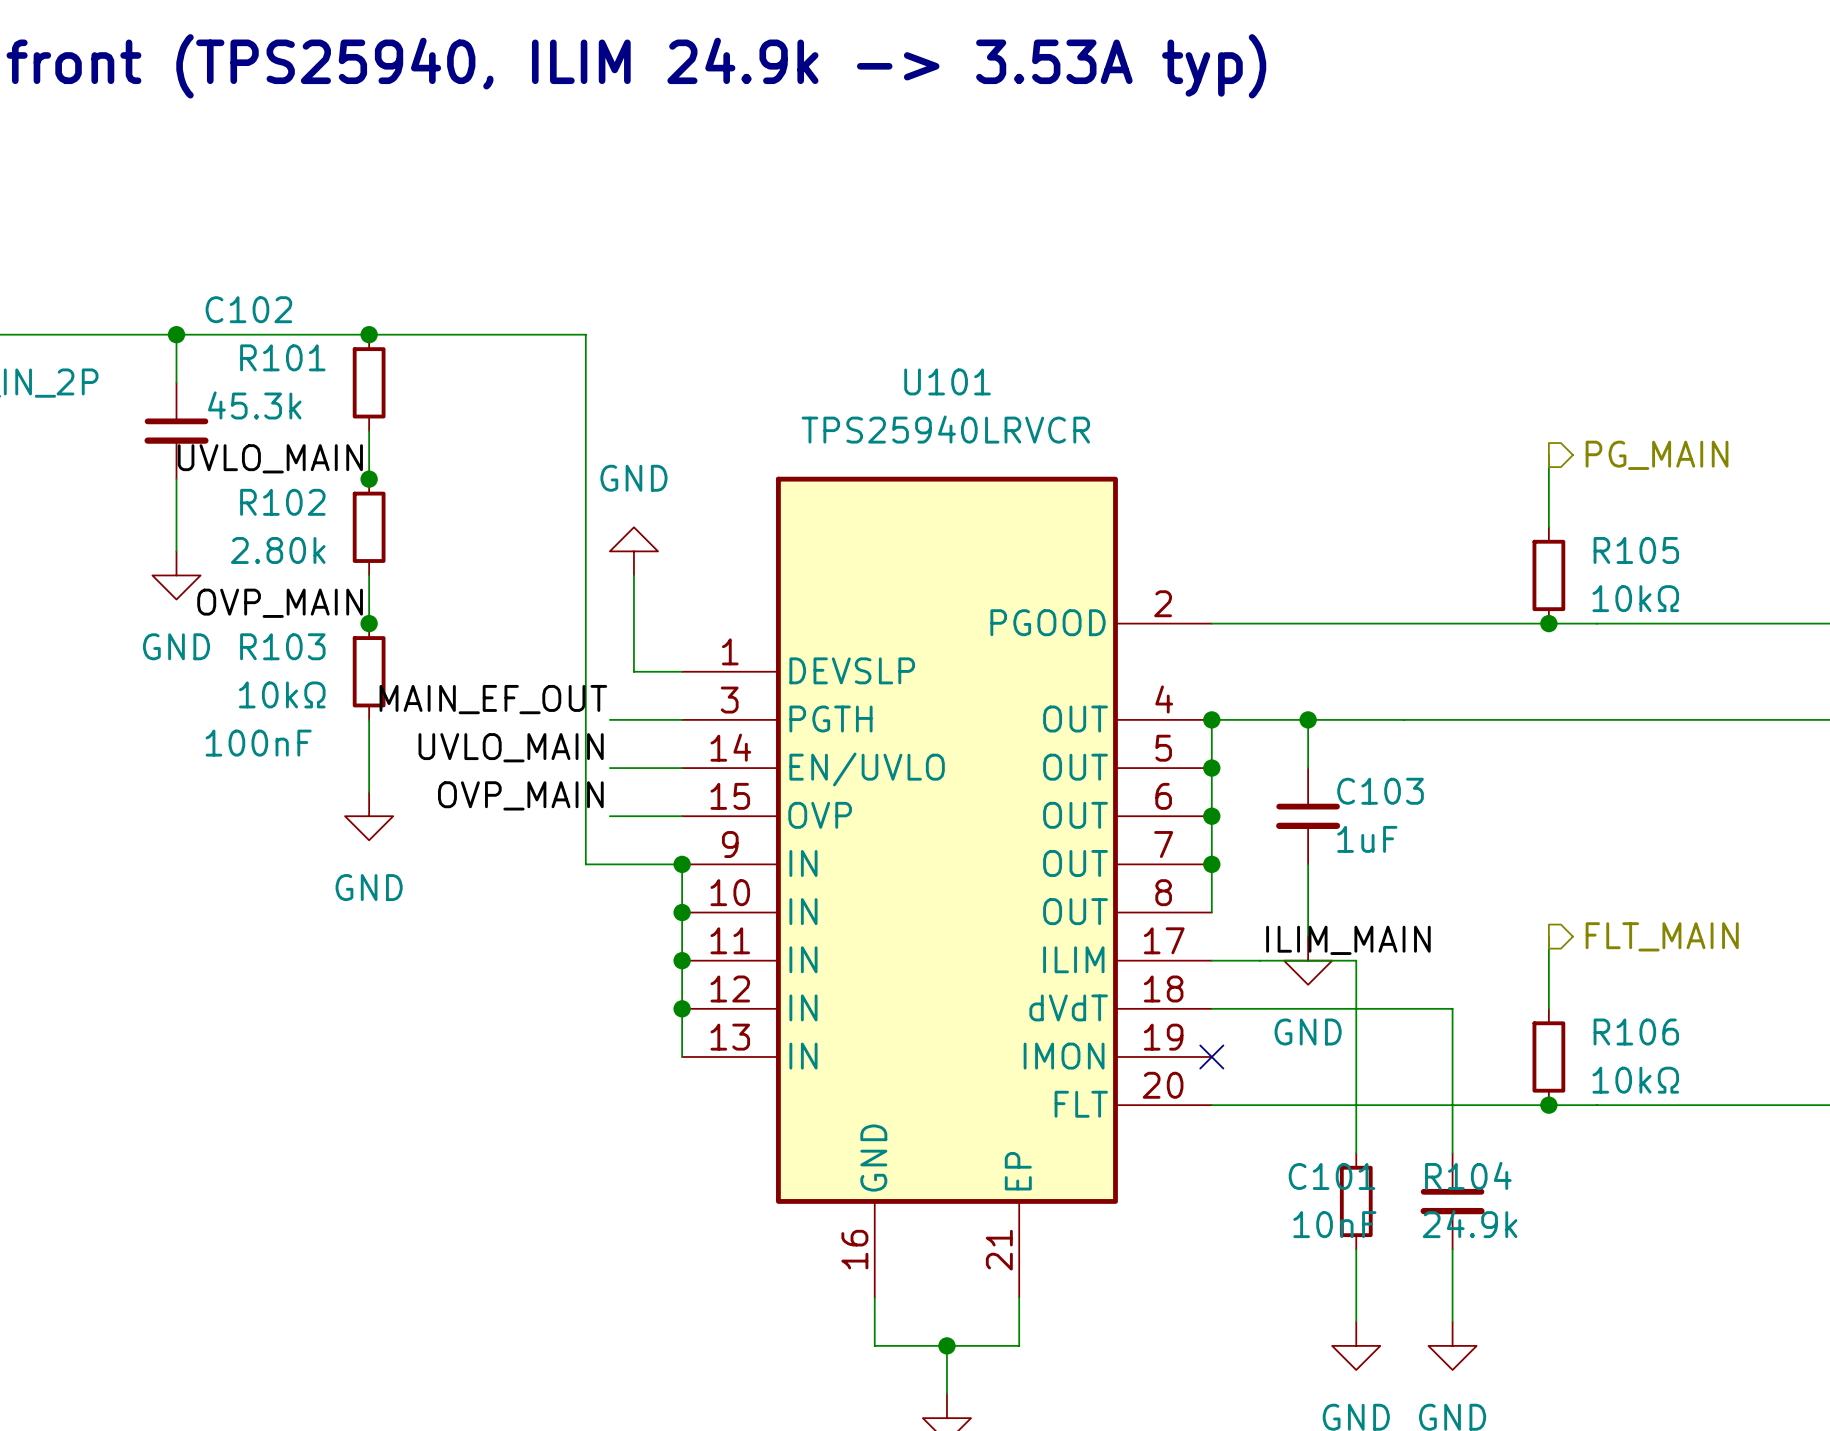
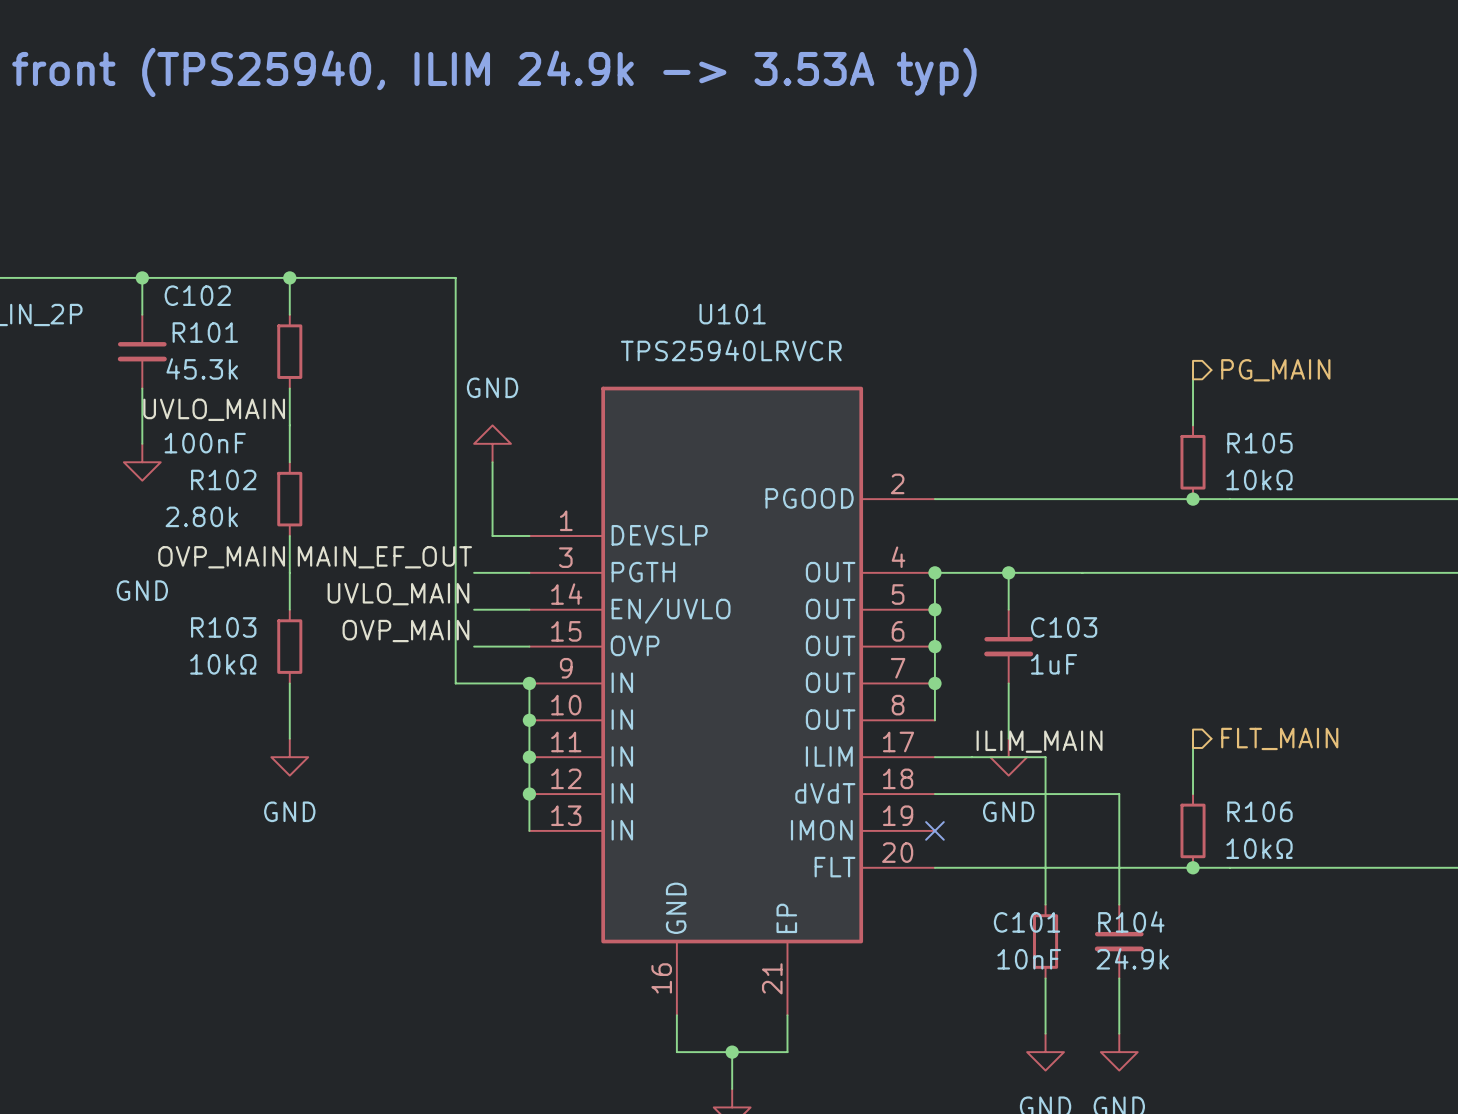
C102 name position: C102 (248, 309) -> C102 (197, 295)
R101 name position: R101 (282, 357) -> R101 (205, 332)
R101 position: (369, 382) -> (289, 351)
wire: (369, 430) (369, 479) -> (289, 277) (289, 314)
label position: UVLO_MAIN (270, 458) -> UVLO_MAIN (214, 409)
junction: (369, 479) -> none
R102 position: (369, 527) -> (289, 499)
R102 value position: 2.80k (278, 550) -> 2.80k (201, 516)
wire: (369, 575) (369, 623) -> (289, 462) (289, 388)
label position: OVP_MAIN (280, 603) -> OVP_MAIN (221, 557)
junction: (369, 623) -> none
power symbol text position: GND (176, 646) -> GND (142, 590)
wire: none -> (289, 535) (289, 572)
R103 position: (369, 671) -> (289, 646)
C102 value position: 100nF (258, 743) -> 100nF (205, 443)
power symbol position: GND (369, 816) -> GND (289, 757)
wire: none -> (289, 683) (289, 738)

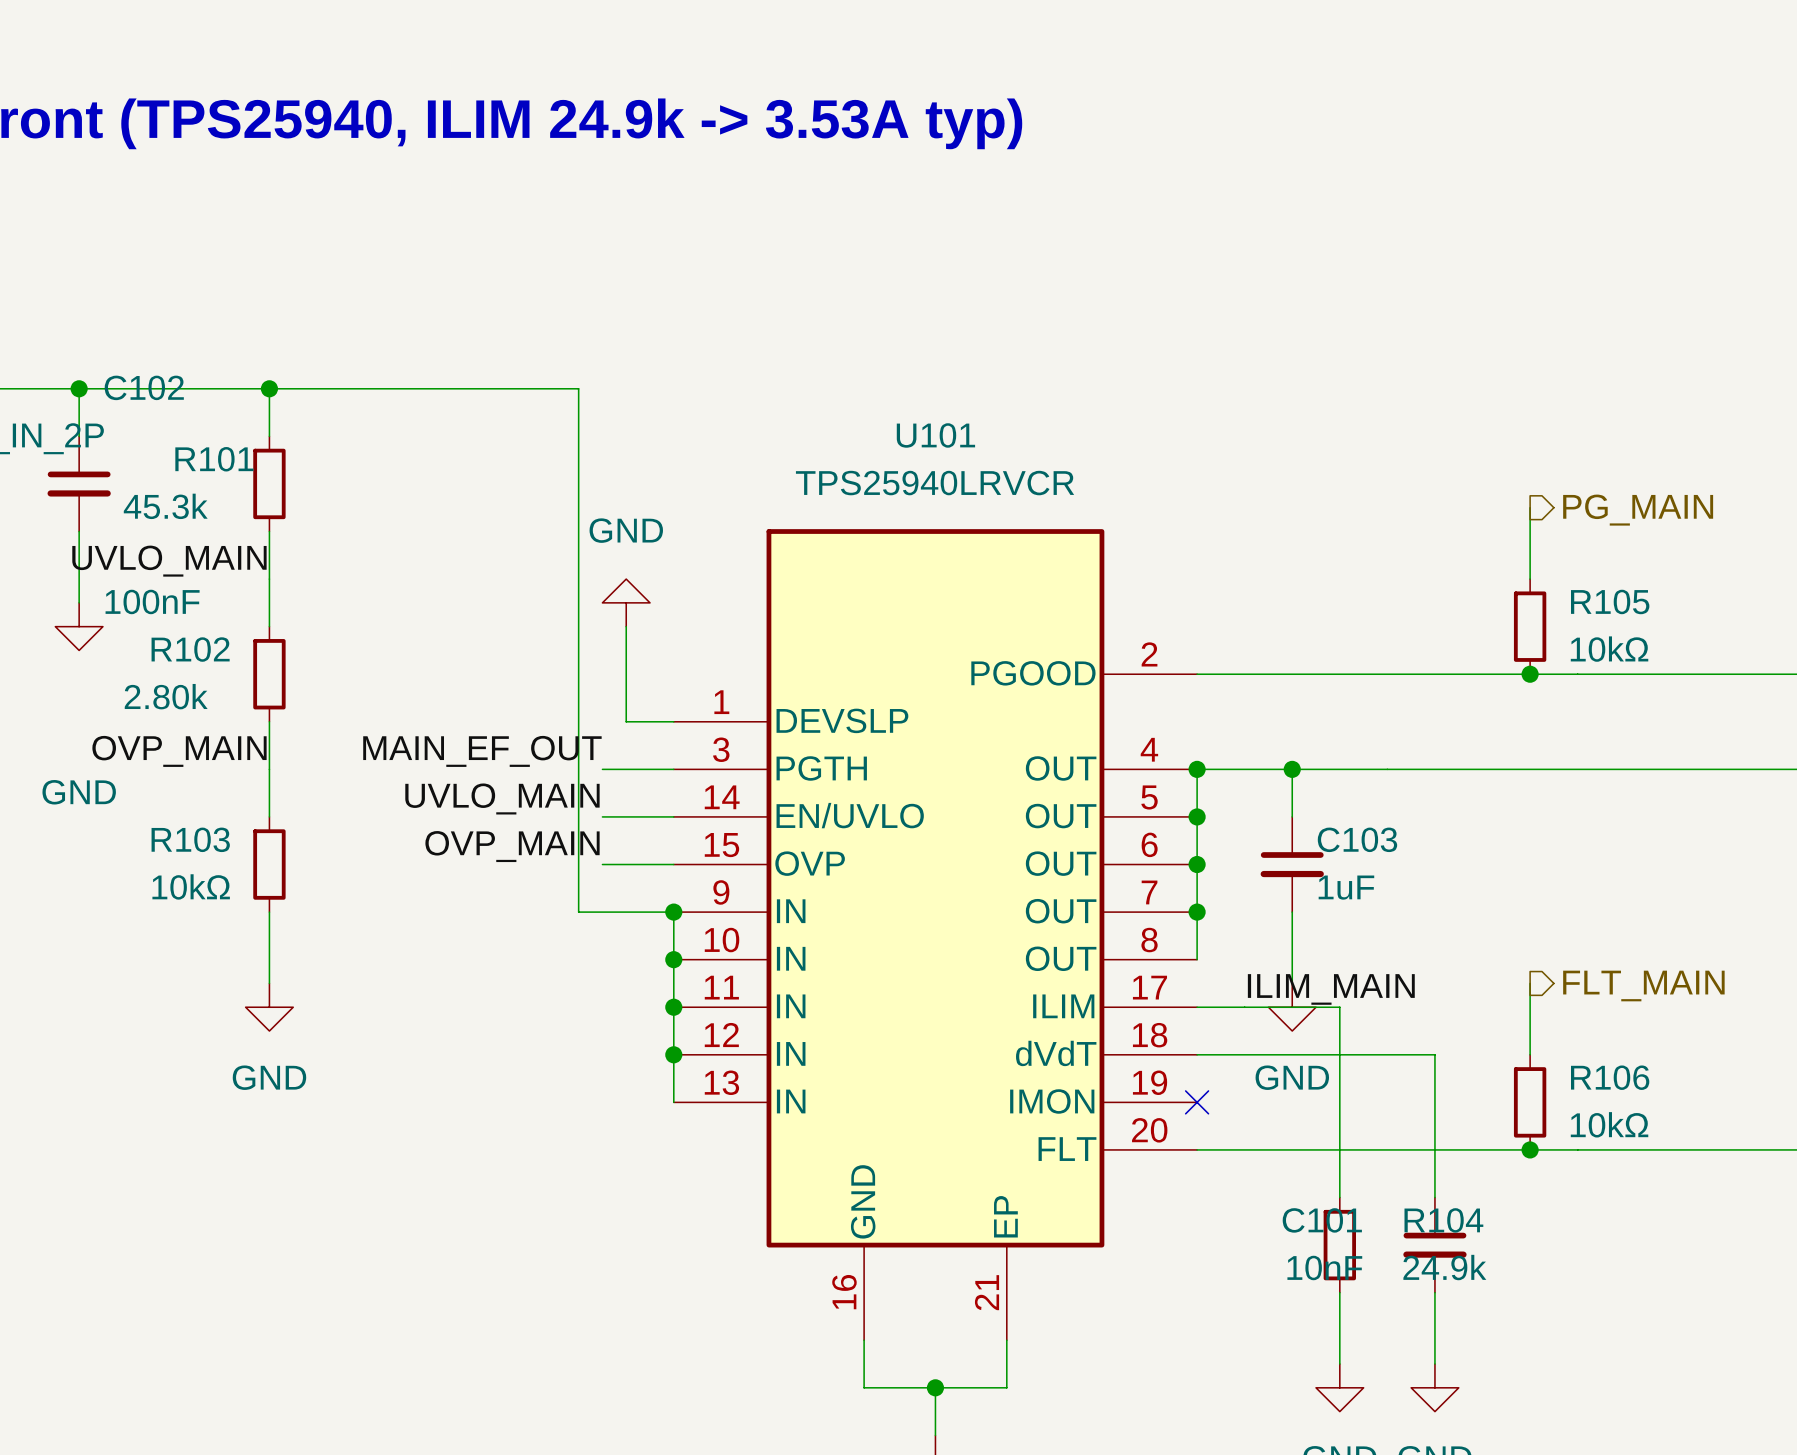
junction: none -> (79, 388)
wire: (142, 277) (142, 314) -> (79, 388) (79, 436)
junction: (142, 277) -> none
junction: none -> (269, 388)
wire: (289, 277) (289, 314) -> (269, 388) (269, 436)
junction: (289, 277) -> none
C102 name position: C102 (197, 295) -> C102 (144, 387)
R101 name position: R101 (205, 332) -> R101 (214, 459)
C102 position: (142, 351) -> (79, 483)
R101 position: (289, 351) -> (269, 483)
wire: (142, 388) (142, 443) -> (79, 531) (79, 602)
wire: (289, 388) (289, 462) -> (269, 531) (269, 626)
label position: UVLO_MAIN (214, 409) -> UVLO_MAIN (169, 561)
power symbol position: GND (142, 462) -> GND (79, 626)
R102 position: (289, 499) -> (269, 674)
wire: (289, 535) (289, 609) -> (269, 721) (269, 816)
label position: OVP_MAIN (221, 557) -> OVP_MAIN (179, 751)
R103 position: (289, 646) -> (269, 864)
wire: (289, 683) (289, 738) -> (269, 912) (269, 983)
power symbol position: GND (289, 757) -> GND (269, 1007)

